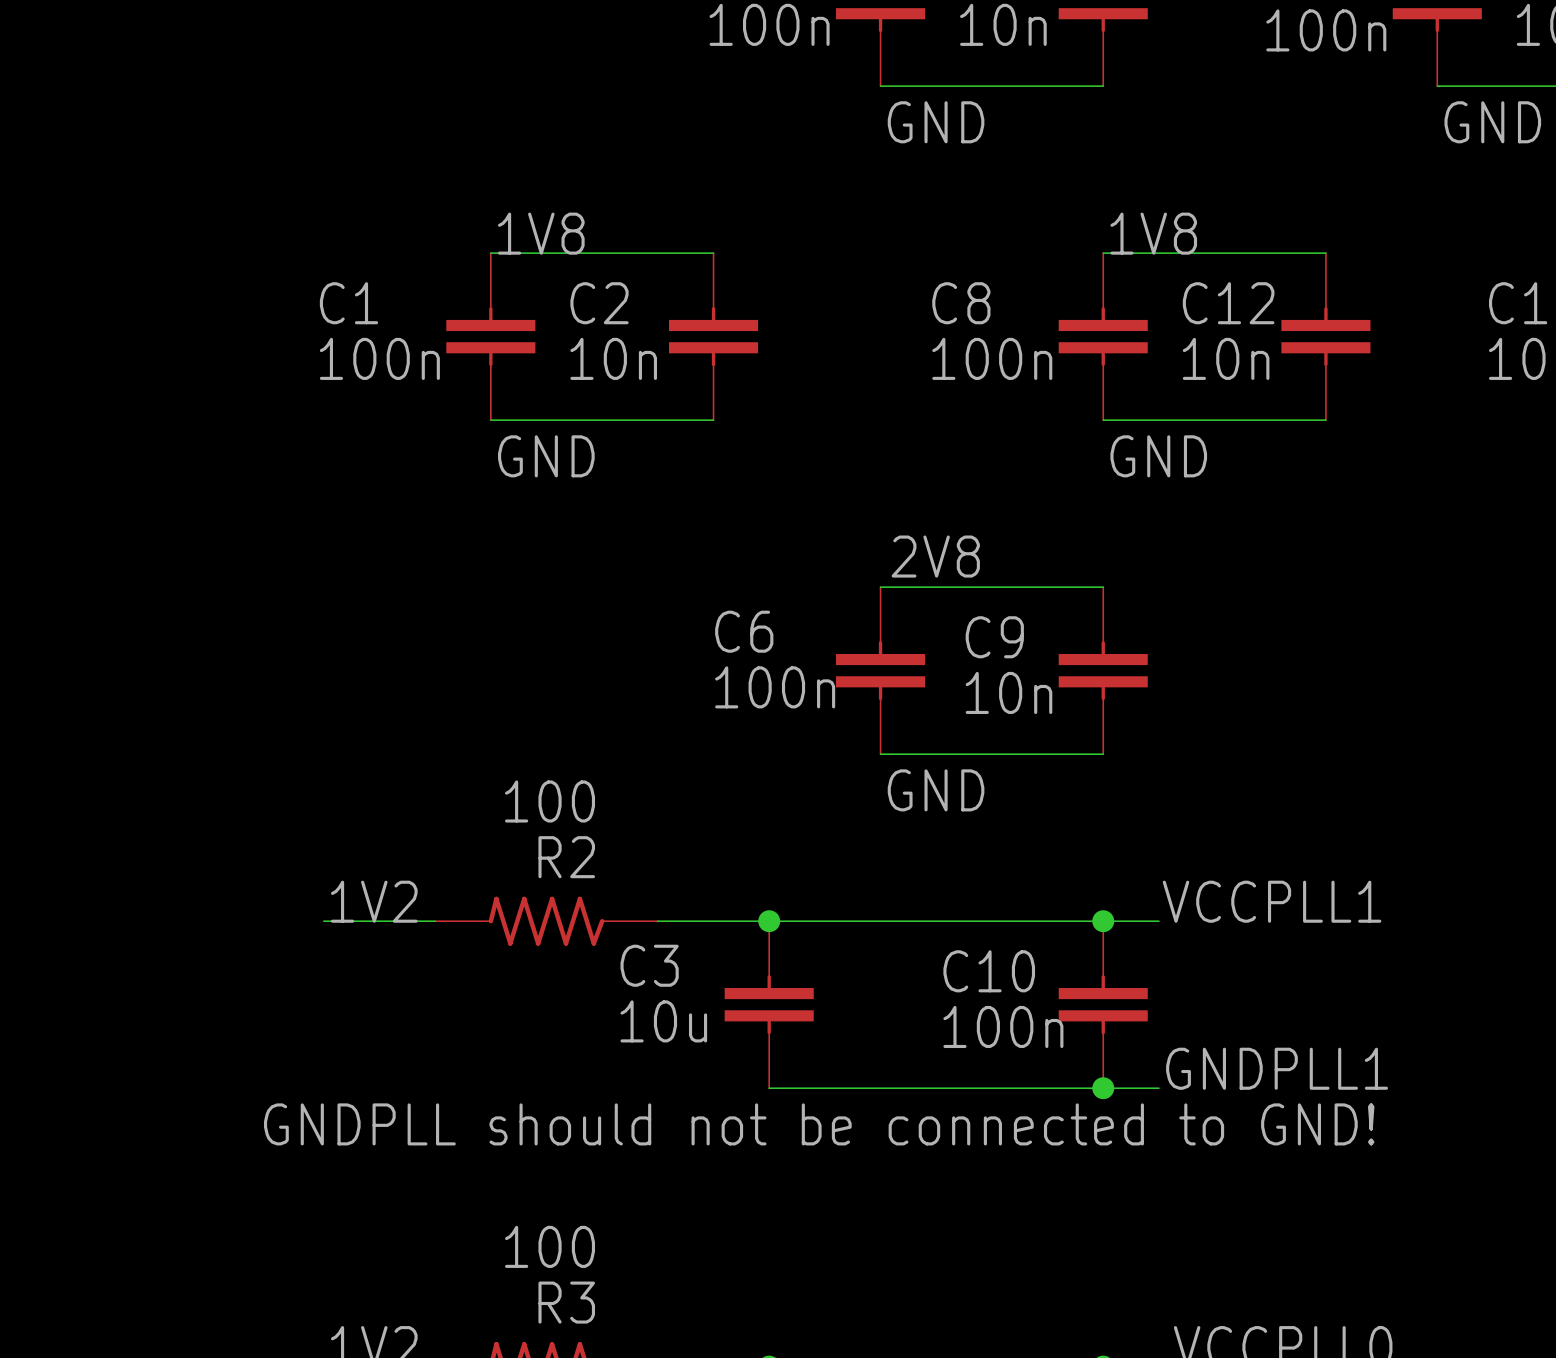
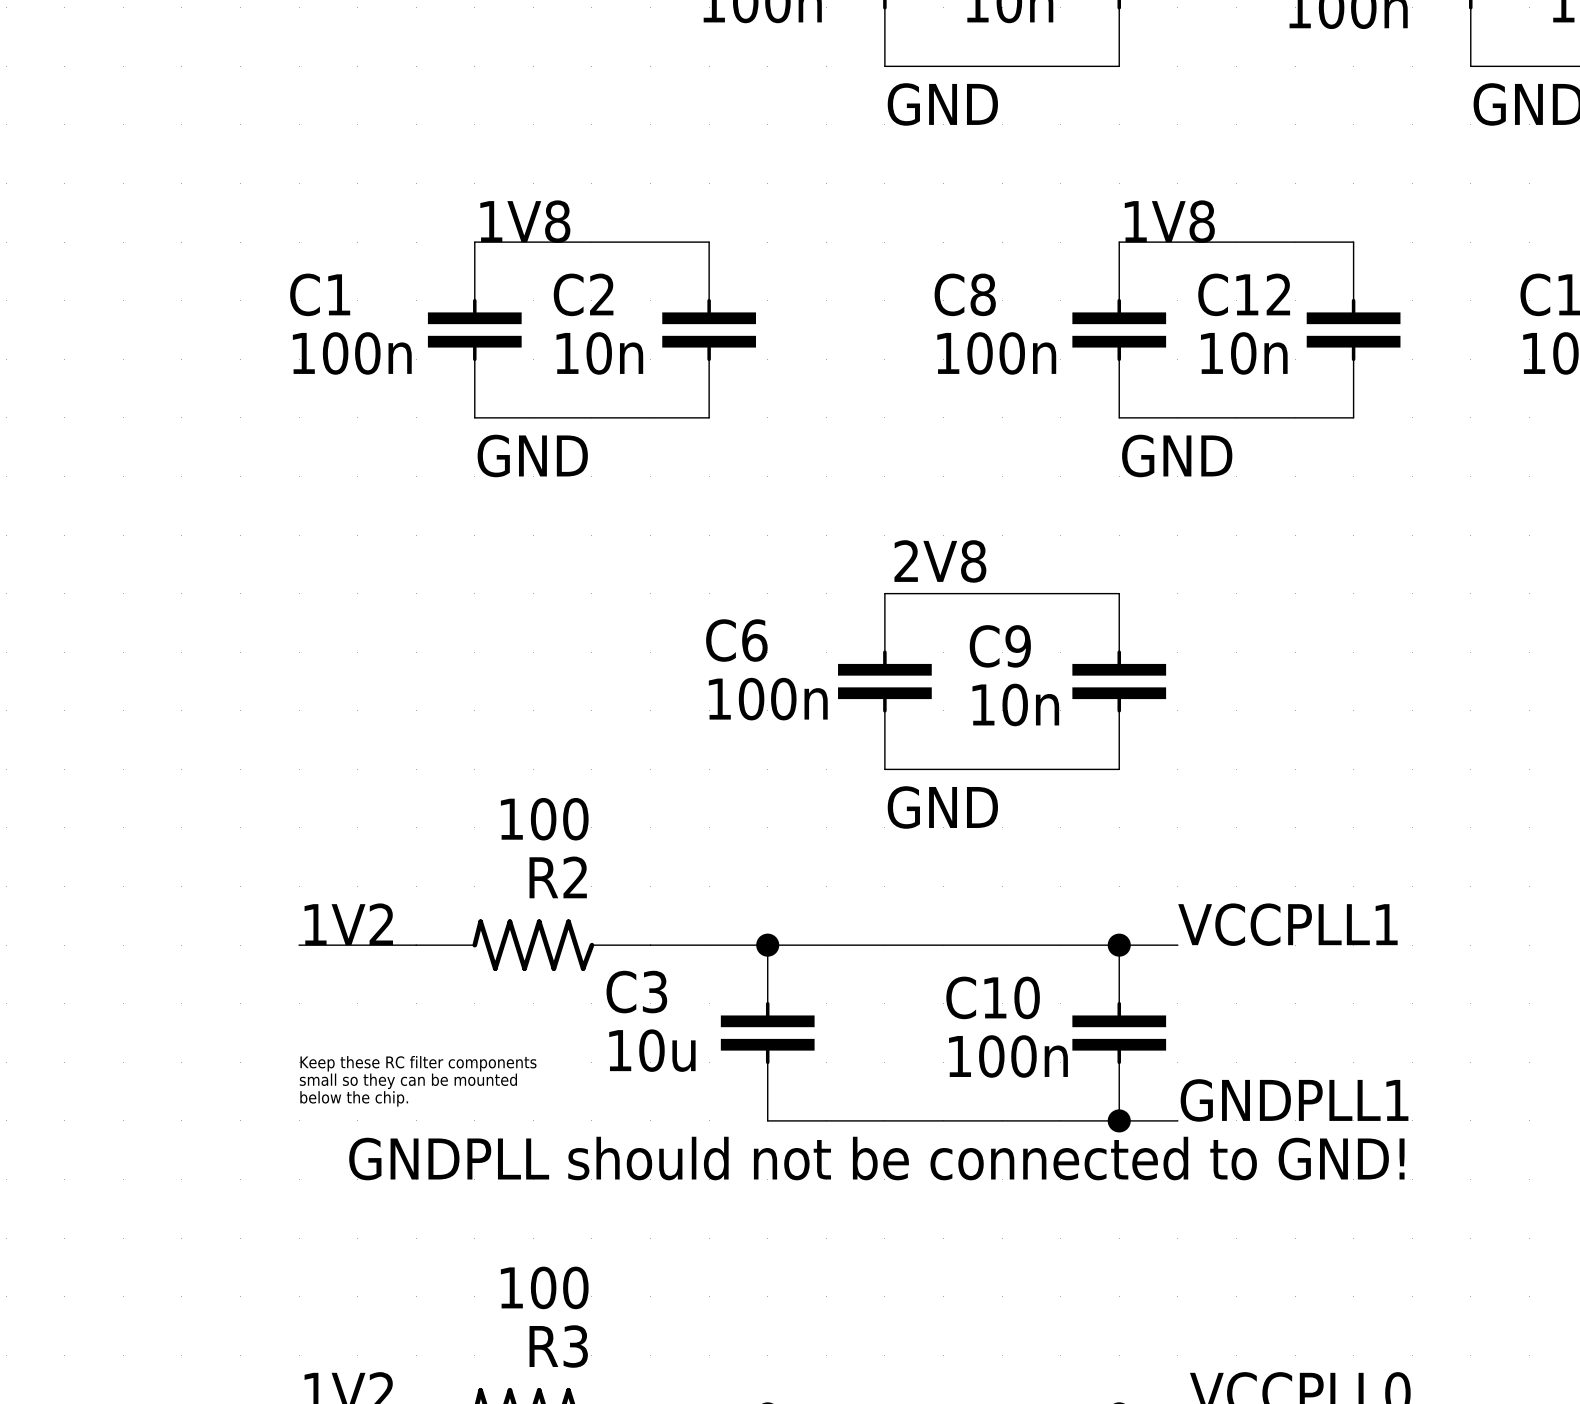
text: none -> Keep these RC filter components (418, 1063)
text: none -> small so they can be mounted (408, 1081)
text: none -> below the chip. (354, 1098)

